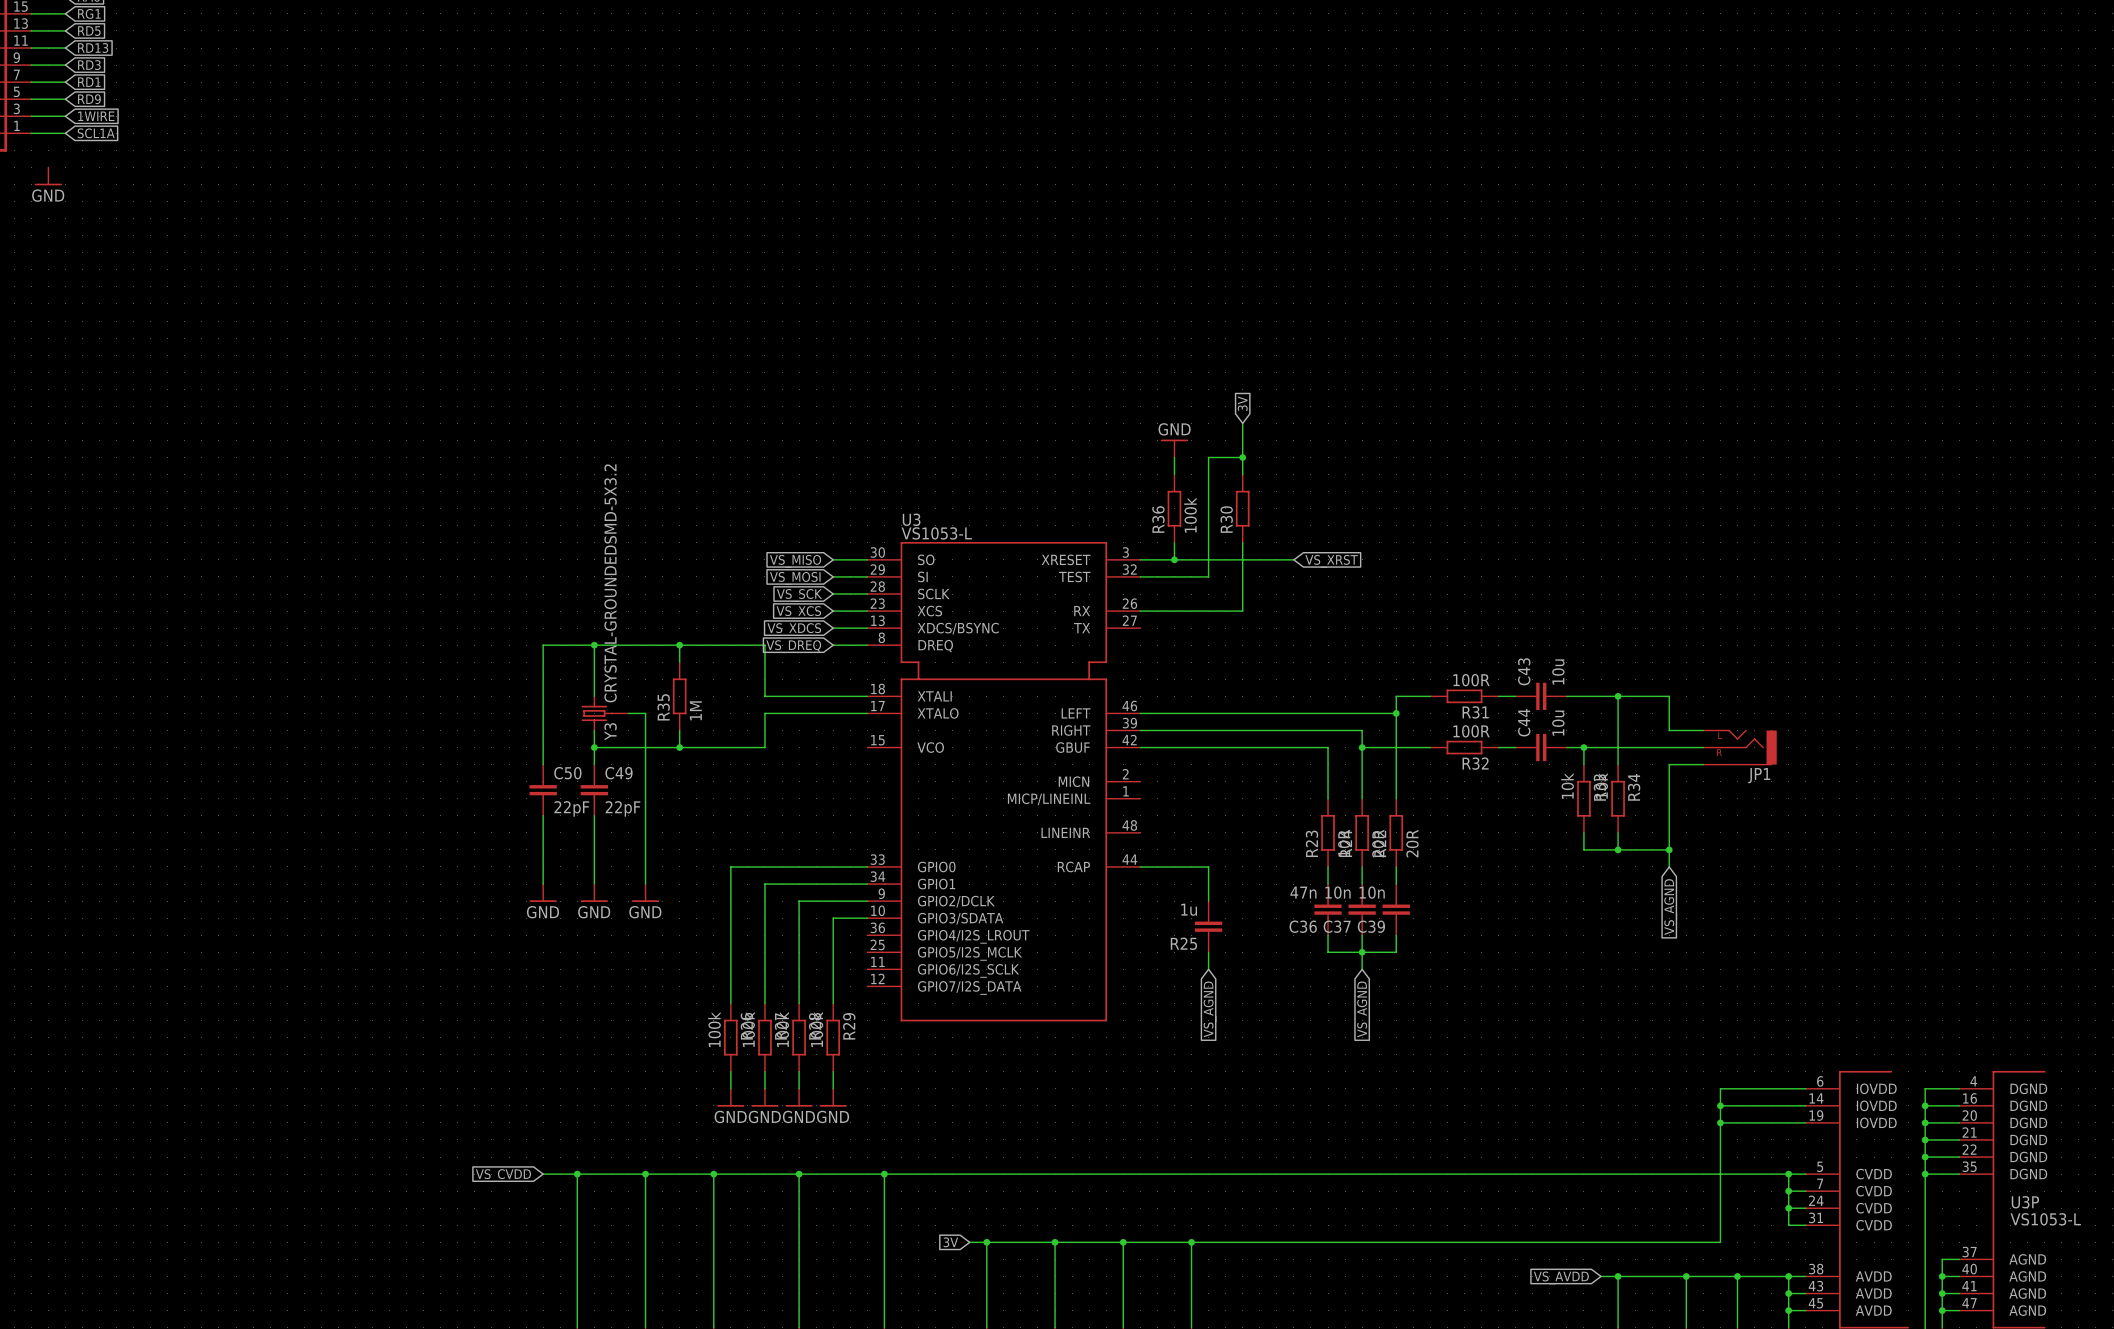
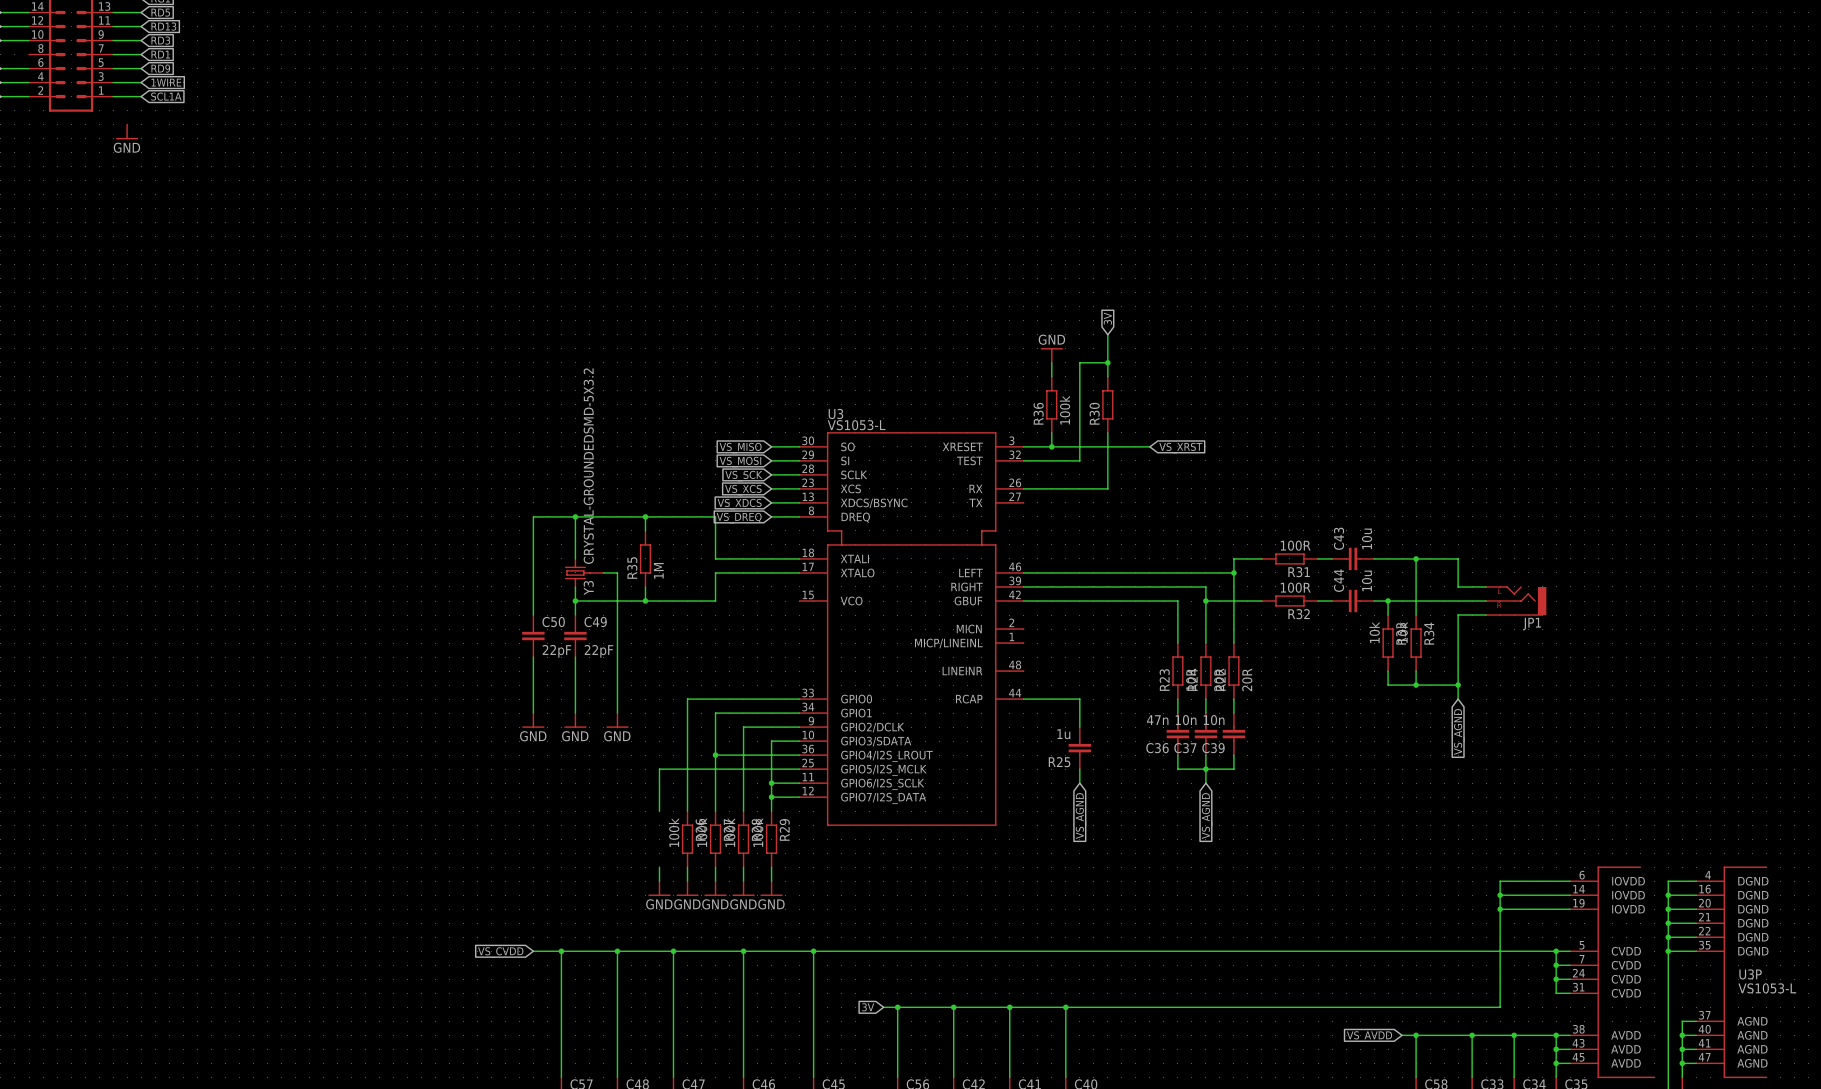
wire: none -> (715, 755) (799, 755)
junction: none -> (715, 755)
wire: none -> (799, 769) (659, 769) (659, 811)
wire: none -> (771, 783) (799, 783)
junction: none -> (771, 783)
wire: none -> (771, 797) (799, 797)
junction: none -> (771, 797)
wire: none -> (659, 867) (659, 881)
power symbol: none -> GND (659, 888)

